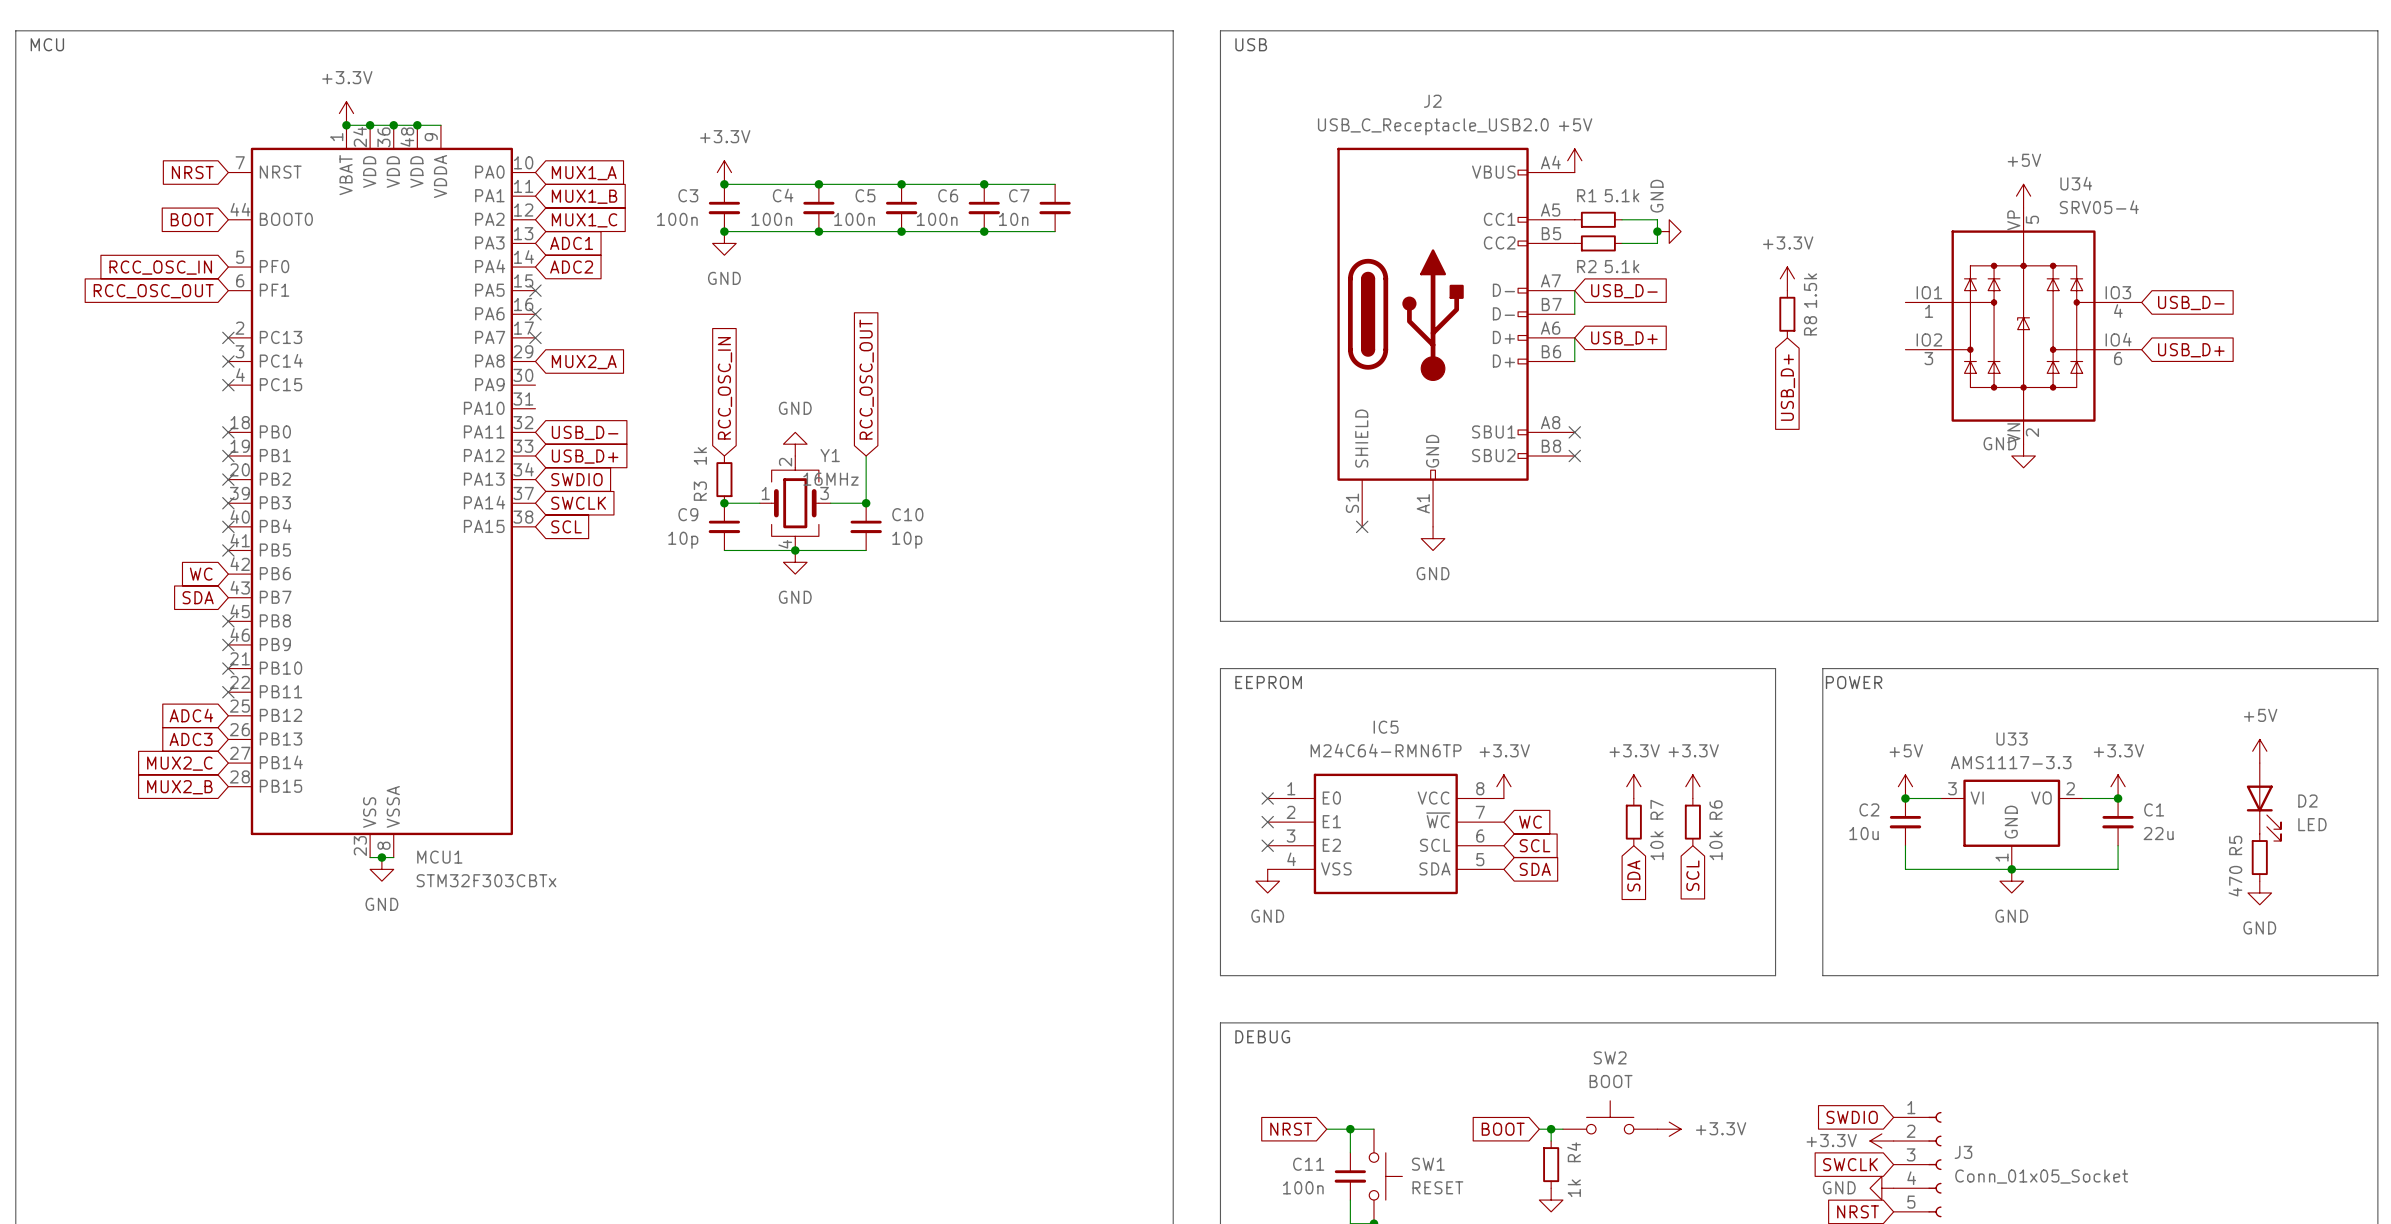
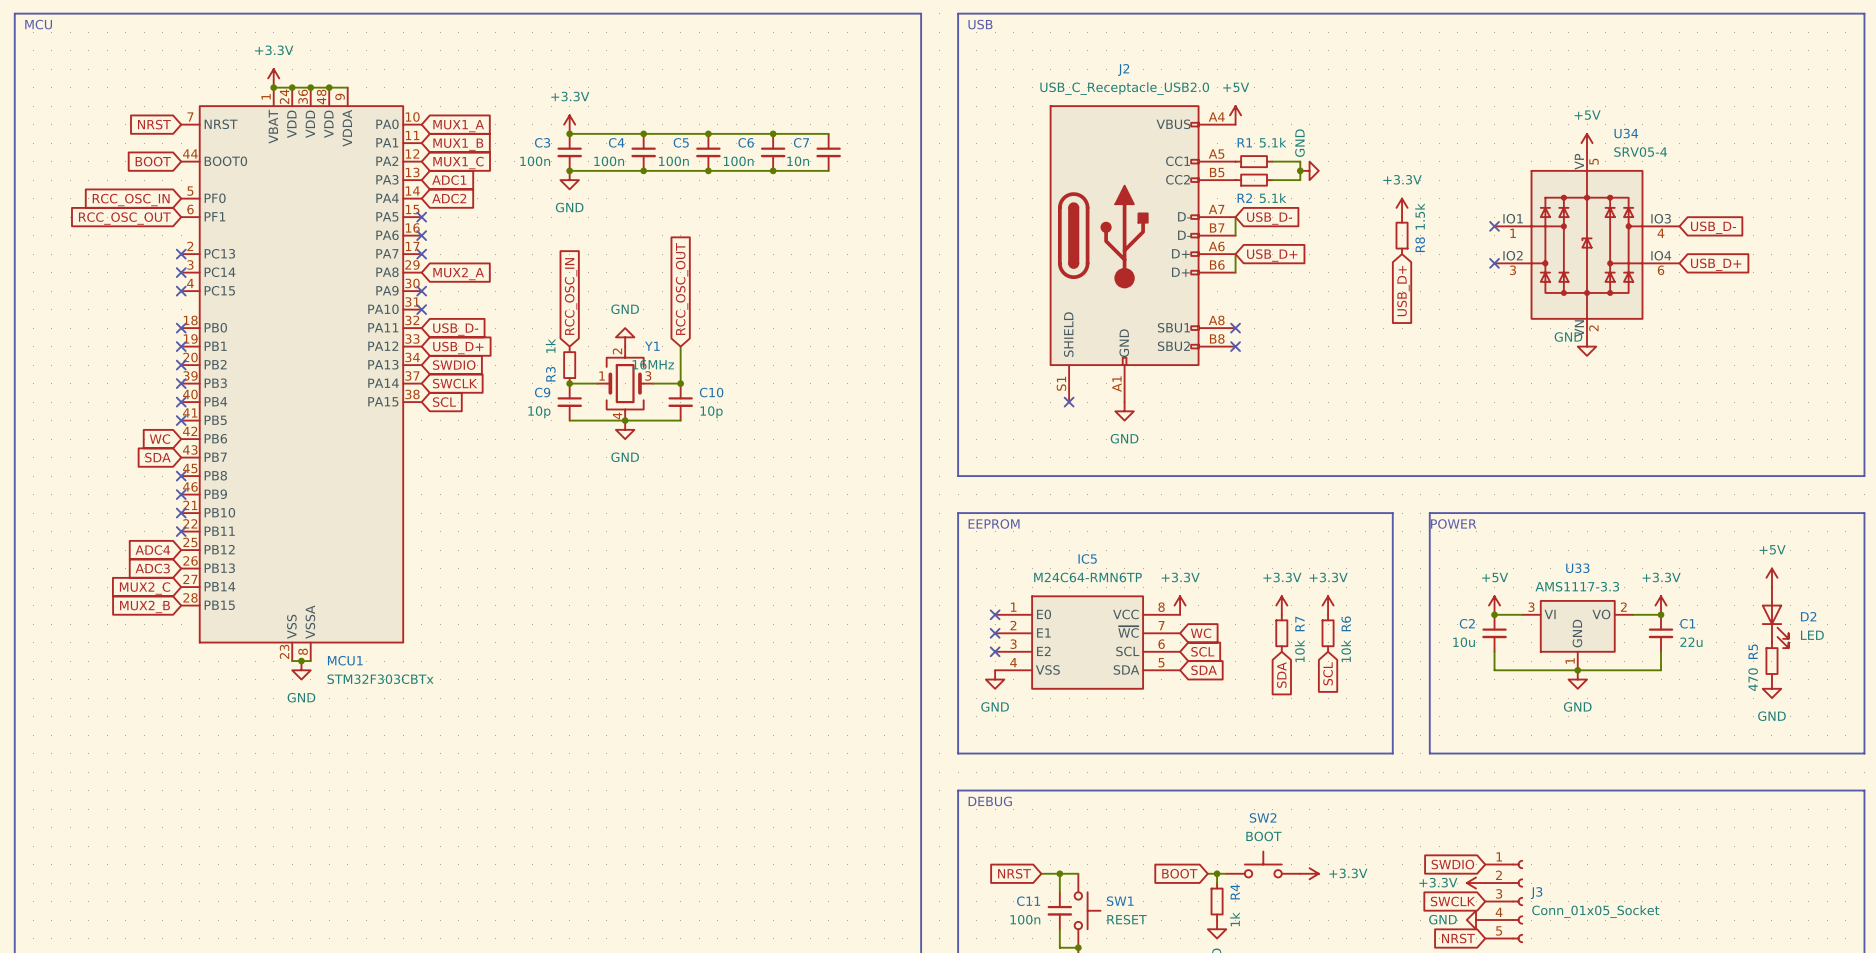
no-connect mark: none -> (1494, 226)
no-connect mark: none -> (1494, 263)
no-connect mark: none -> (421, 291)
no-connect mark: none -> (421, 309)

